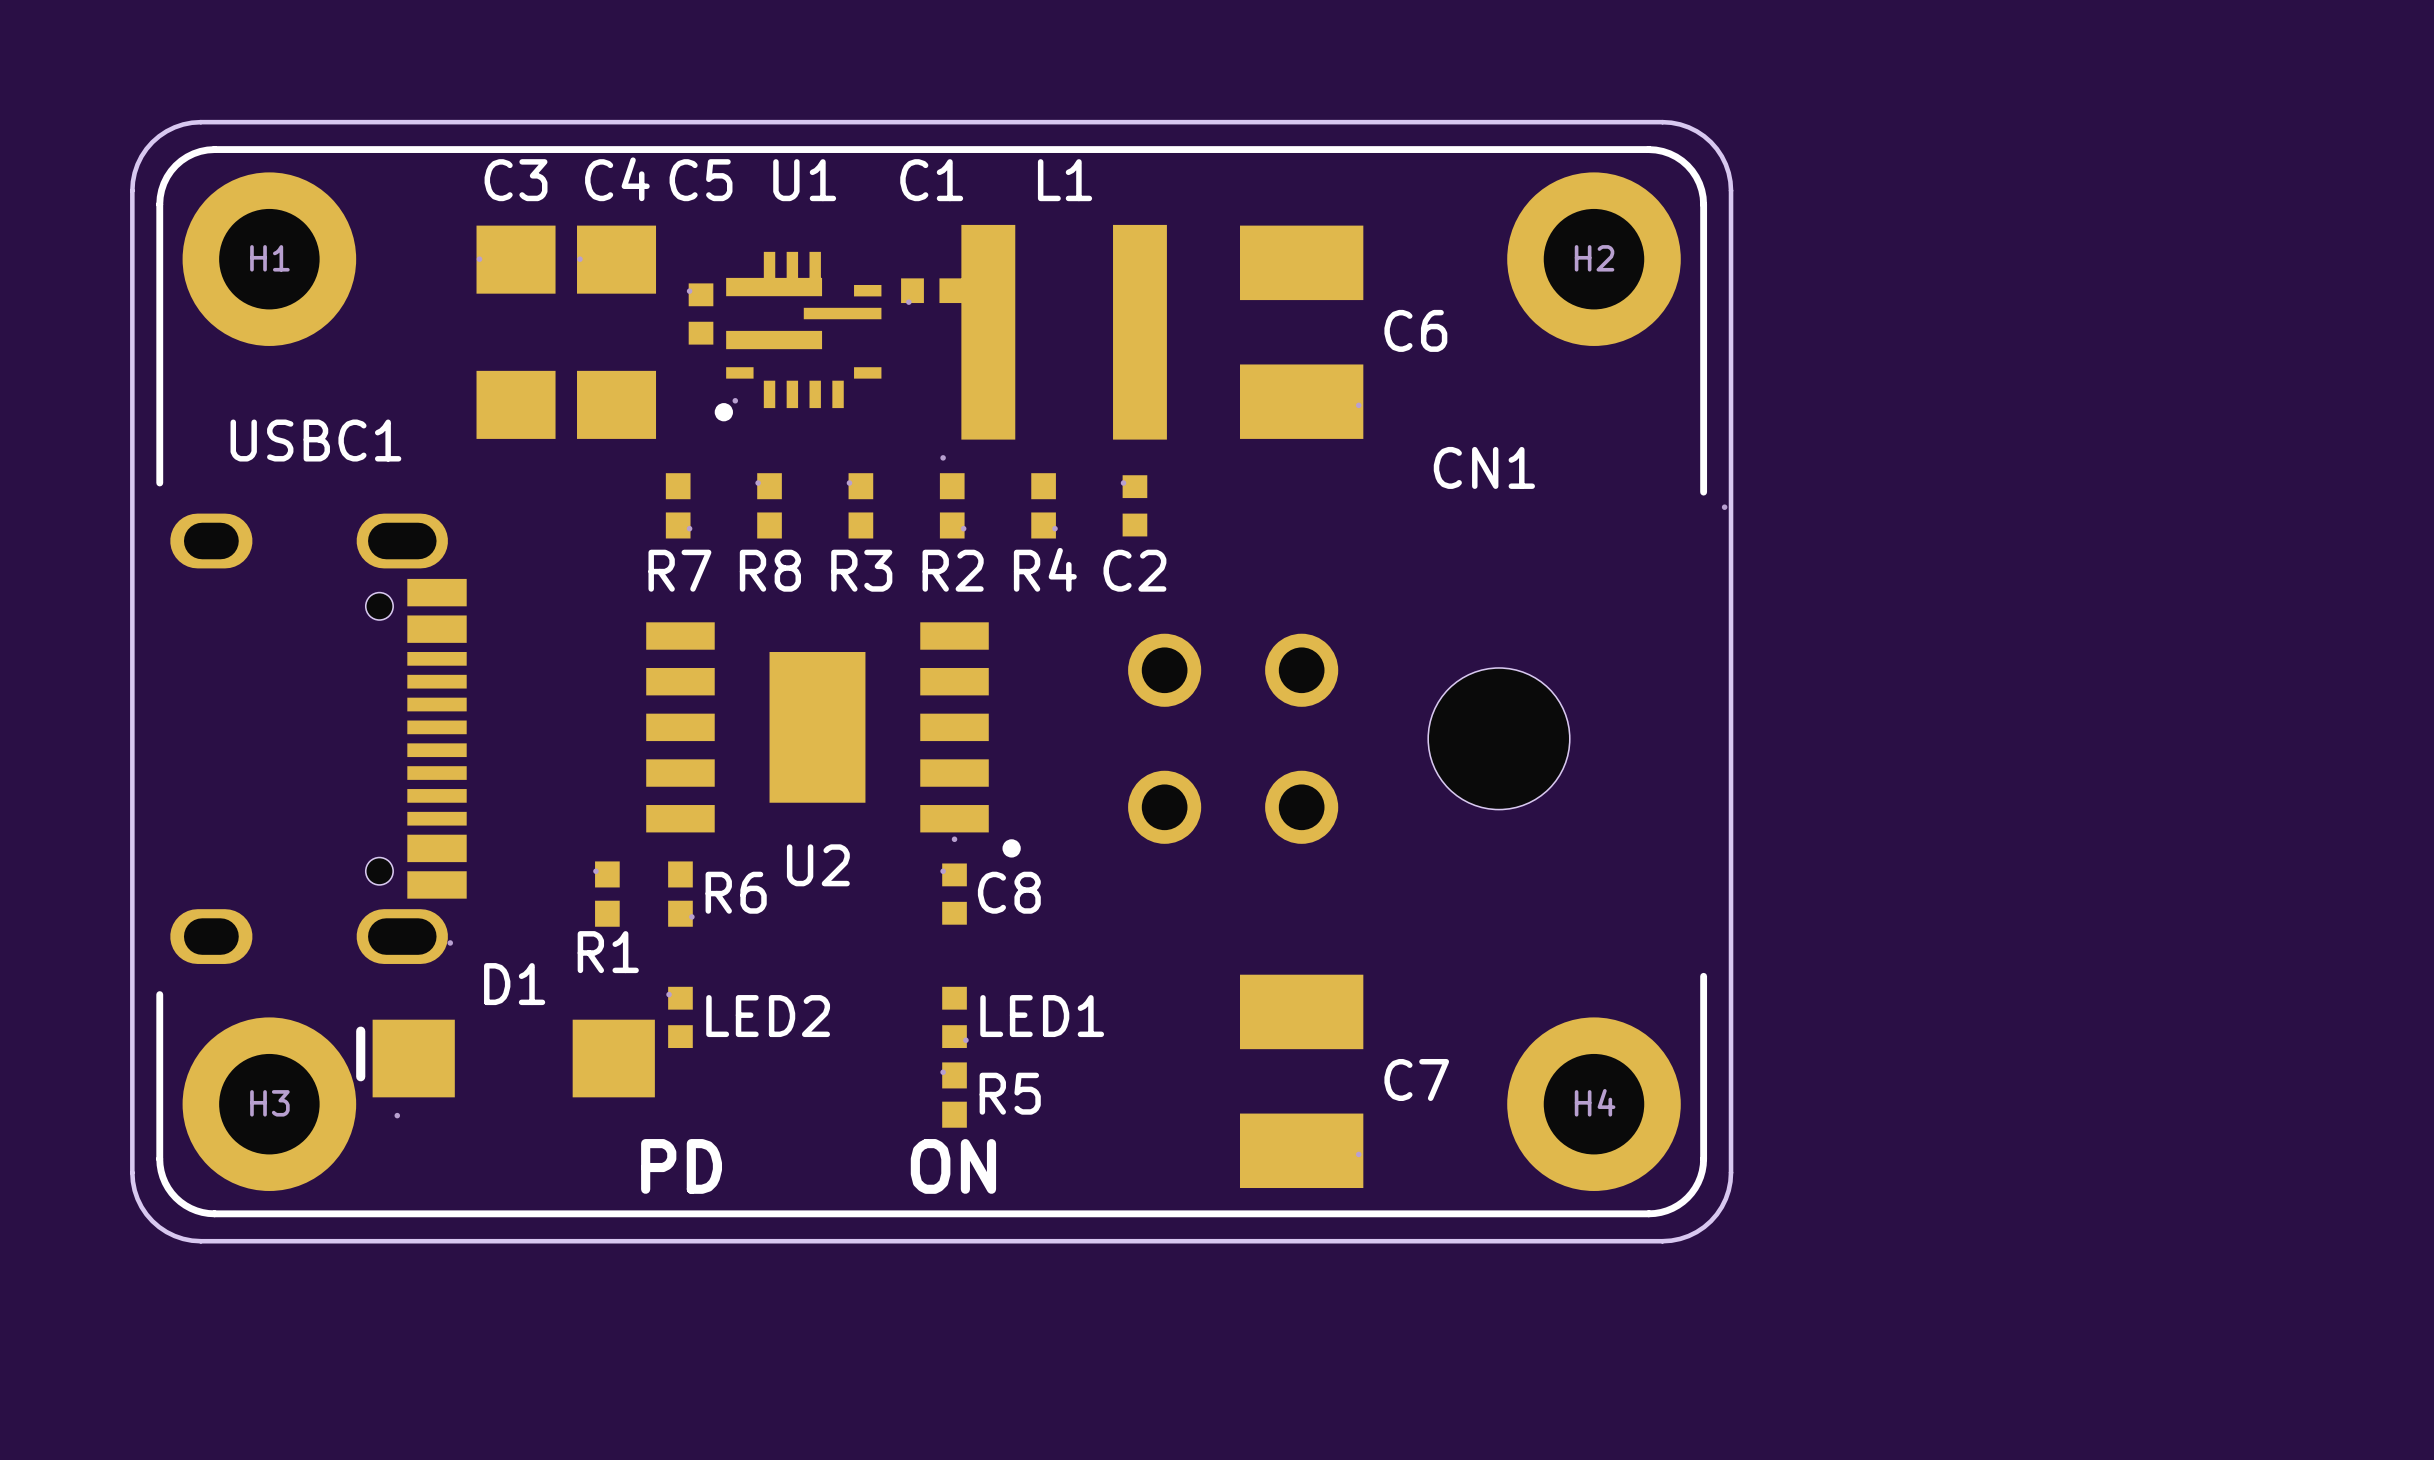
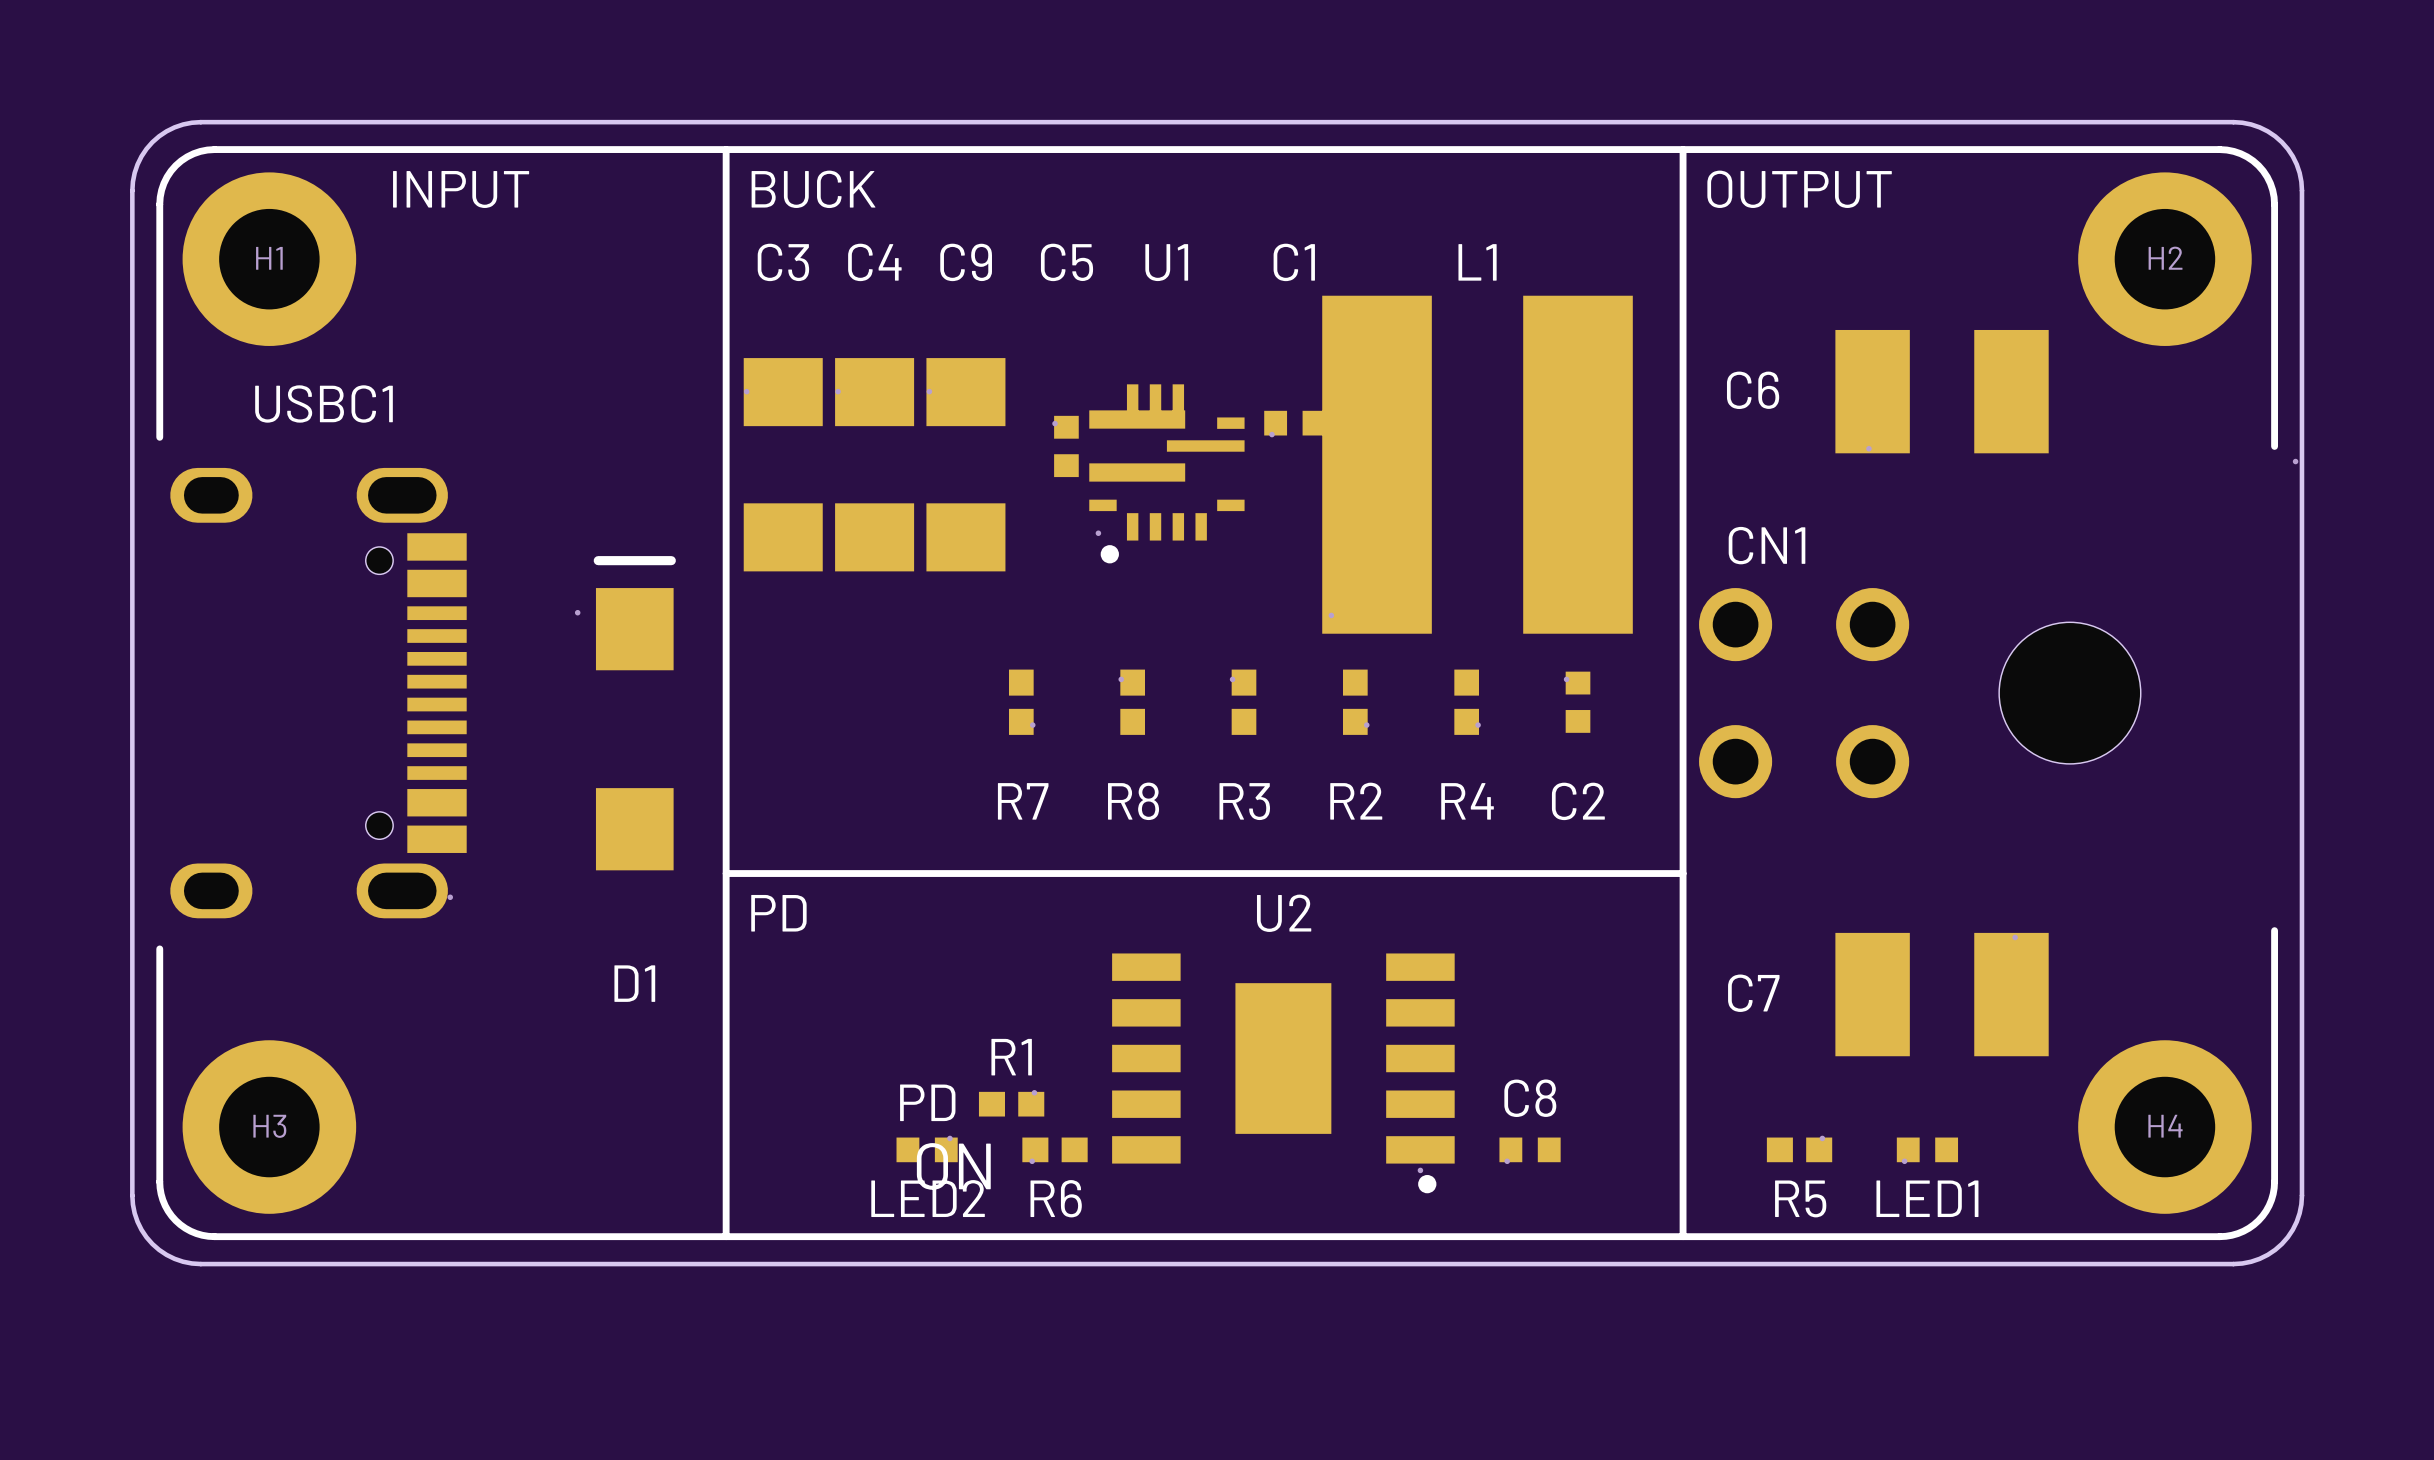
board edge: (1662, 122) (1688, 127) (1710, 142) (1725, 164) (1731, 190) (1731, 1172) (1728, 1190) (1721, 1206) (1704, 1227) (1680, 1238) (1662, 1241) (200, 1241) (174, 1236) (152, 1221) (137, 1198) (132, 1172) -> (1662, 122) (2233, 122) (2251, 124) (2267, 131) (2281, 142) (2292, 156) (2299, 172) (2301, 190) (2301, 1195) (2296, 1221) (2287, 1237) (2275, 1249) (2251, 1261) (2233, 1264) (200, 1264) (183, 1261) (166, 1254) (146, 1237) (134, 1213) (132, 1172)
line: none -> (726, 149) (726, 1236)
line: (1648, 149) (1669, 153) (1687, 165) (1699, 183) (1703, 197) (1703, 492) -> (1648, 149) (2219, 149) (2240, 153) (2253, 160) (2263, 171) (2270, 183) (2274, 197) (2274, 446)
line: none -> (1683, 149) (1683, 1236)
C4 name position: C4 (617, 179) -> C4 (874, 262)
C3 name position: C3 (516, 180) -> C3 (783, 262)
C5 name position: C5 (701, 180) -> C5 (1067, 262)
U1 name position: U1 (804, 180) -> U1 (1166, 262)
C1 name position: C1 (931, 180) -> C1 (1294, 262)
text: none -> INPUT (461, 189)
text: none -> BUCK (813, 189)
text: none -> OUTPUT (1799, 189)
L1 footprint: [940, 224, 1167, 461] -> [1322, 295, 1633, 634]
H2 position: (1593, 259) -> (2164, 259)
C1 position: (931, 291) -> (1294, 424)
C5 position: (700, 313) -> (1065, 446)
U1 position: (803, 329) -> (1166, 462)
C6 name position: C6 (1415, 330) -> C6 (1753, 390)
C3 position: (516, 332) -> (783, 464)
C4 position: (616, 332) -> (874, 464)
C6 rotation: 0° (1301, 332) -> 90° clockwise (1942, 391)
C6 position: (1301, 332) -> (1942, 391)
drawing: [714, 403, 733, 422] -> none
line: (159, 437) (159, 482) -> none
USBC1 name position: USBC1 (315, 440) -> USBC1 (324, 404)
C9: none -> (965, 464)
CN1 name position: CN1 (1484, 467) -> CN1 (1767, 545)
R7 position: (679, 505) -> (1022, 702)
R8 position: (768, 505) -> (1131, 702)
R3 position: (859, 505) -> (1243, 702)
R2 position: (953, 505) -> (1356, 702)
R4 position: (1044, 505) -> (1467, 702)
C2 position: (1134, 505) -> (1577, 702)
drawing: none -> [1100, 545, 1119, 564]
line: none -> (598, 560) (671, 560)
R4 name position: R4 (1045, 569) -> R4 (1467, 801)
R7 name position: R7 (679, 570) -> R7 (1023, 801)
R8 name position: R8 (770, 570) -> R8 (1133, 801)
R3 name position: R3 (861, 570) -> R3 (1244, 801)
R2 name position: R2 (953, 570) -> R2 (1356, 801)
C2 name position: C2 (1134, 570) -> C2 (1578, 801)
CN1 position: (1427, 674) -> (1998, 628)
U2 position: (817, 732) -> (1283, 1063)
USBC1 position: (318, 738) -> (318, 693)
drawing: [1002, 839, 1021, 858] -> none
U2 name position: U2 (818, 865) -> U2 (1284, 913)
line: none -> (726, 873) (1683, 873)
R1 rotation: 0° (606, 894) -> 90° clockwise (1011, 1103)
R1 position: (606, 894) -> (1011, 1103)
R6 rotation: 0° (681, 894) -> 90° clockwise (1055, 1150)
R6 position: (681, 894) -> (1055, 1150)
C8 rotation: 0° (953, 894) -> 90° counterclockwise (1530, 1150)
C8 position: (953, 894) -> (1530, 1150)
text: none -> PD (778, 913)
line: (1703, 976) (1702, 1171) (1698, 1182) (1687, 1197) (1672, 1208) (1654, 1213) (214, 1213) (196, 1210) (175, 1197) (165, 1182) (159, 1159) -> (2274, 930) (2274, 1187) (2269, 1205) (2258, 1220) (2243, 1231) (2225, 1236) (214, 1236) (190, 1231) (180, 1224) (168, 1211) (160, 1187) (159, 1159)
D1 name position: D1 (514, 984) -> D1 (634, 983)
LED2 rotation: 0° (679, 1017) -> 90° clockwise (927, 1148)
LED2 position: (679, 1017) -> (927, 1148)
LED1 rotation: 0° (955, 1017) -> 90° clockwise (1927, 1150)
LED1 position: (955, 1017) -> (1927, 1150)
line: (360, 1031) (360, 1076) -> (159, 948) (159, 994)
D1 rotation: 0° (513, 1069) -> 90° clockwise (624, 729)
D1 position: (513, 1069) -> (624, 729)
C7 name position: C7 (1416, 1079) -> C7 (1753, 993)
C7 rotation: 0° (1301, 1081) -> 90° counterclockwise (1942, 994)
C7 position: (1301, 1081) -> (1942, 994)
R5 rotation: 0° (953, 1095) -> 90° clockwise (1799, 1148)
R5 position: (953, 1095) -> (1799, 1148)
text: none -> PD (927, 1102)
H3 position: (269, 1104) -> (269, 1127)
H4 position: (1593, 1104) -> (2164, 1127)
text: PD (681, 1166) -> none
drawing: none -> [1418, 1174, 1437, 1194]

